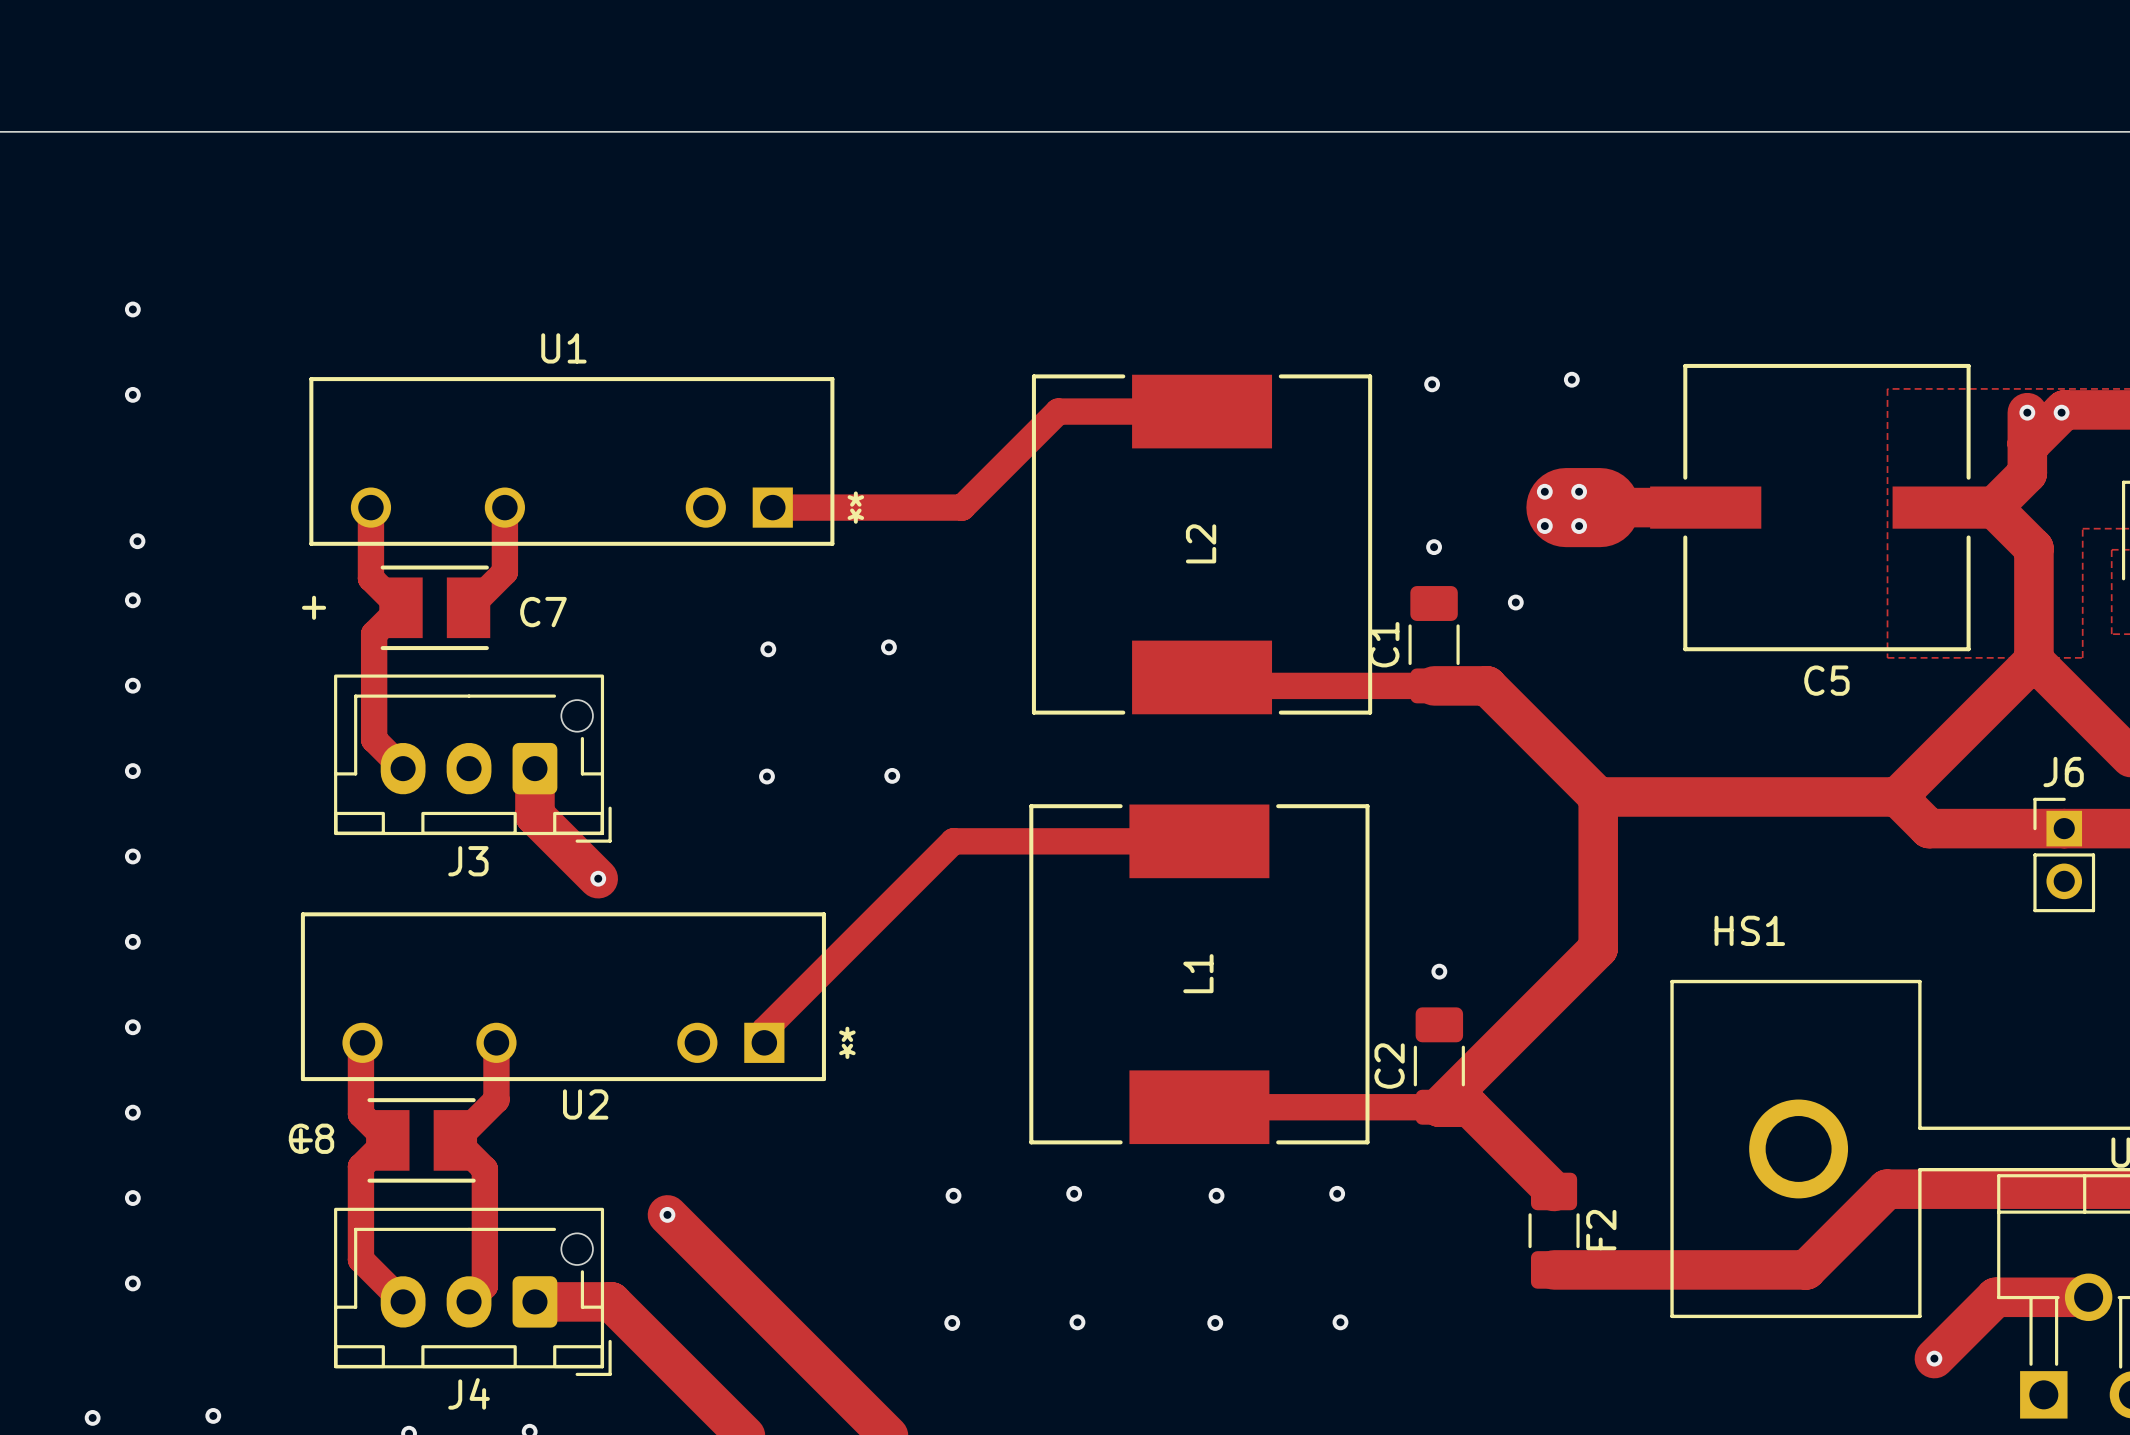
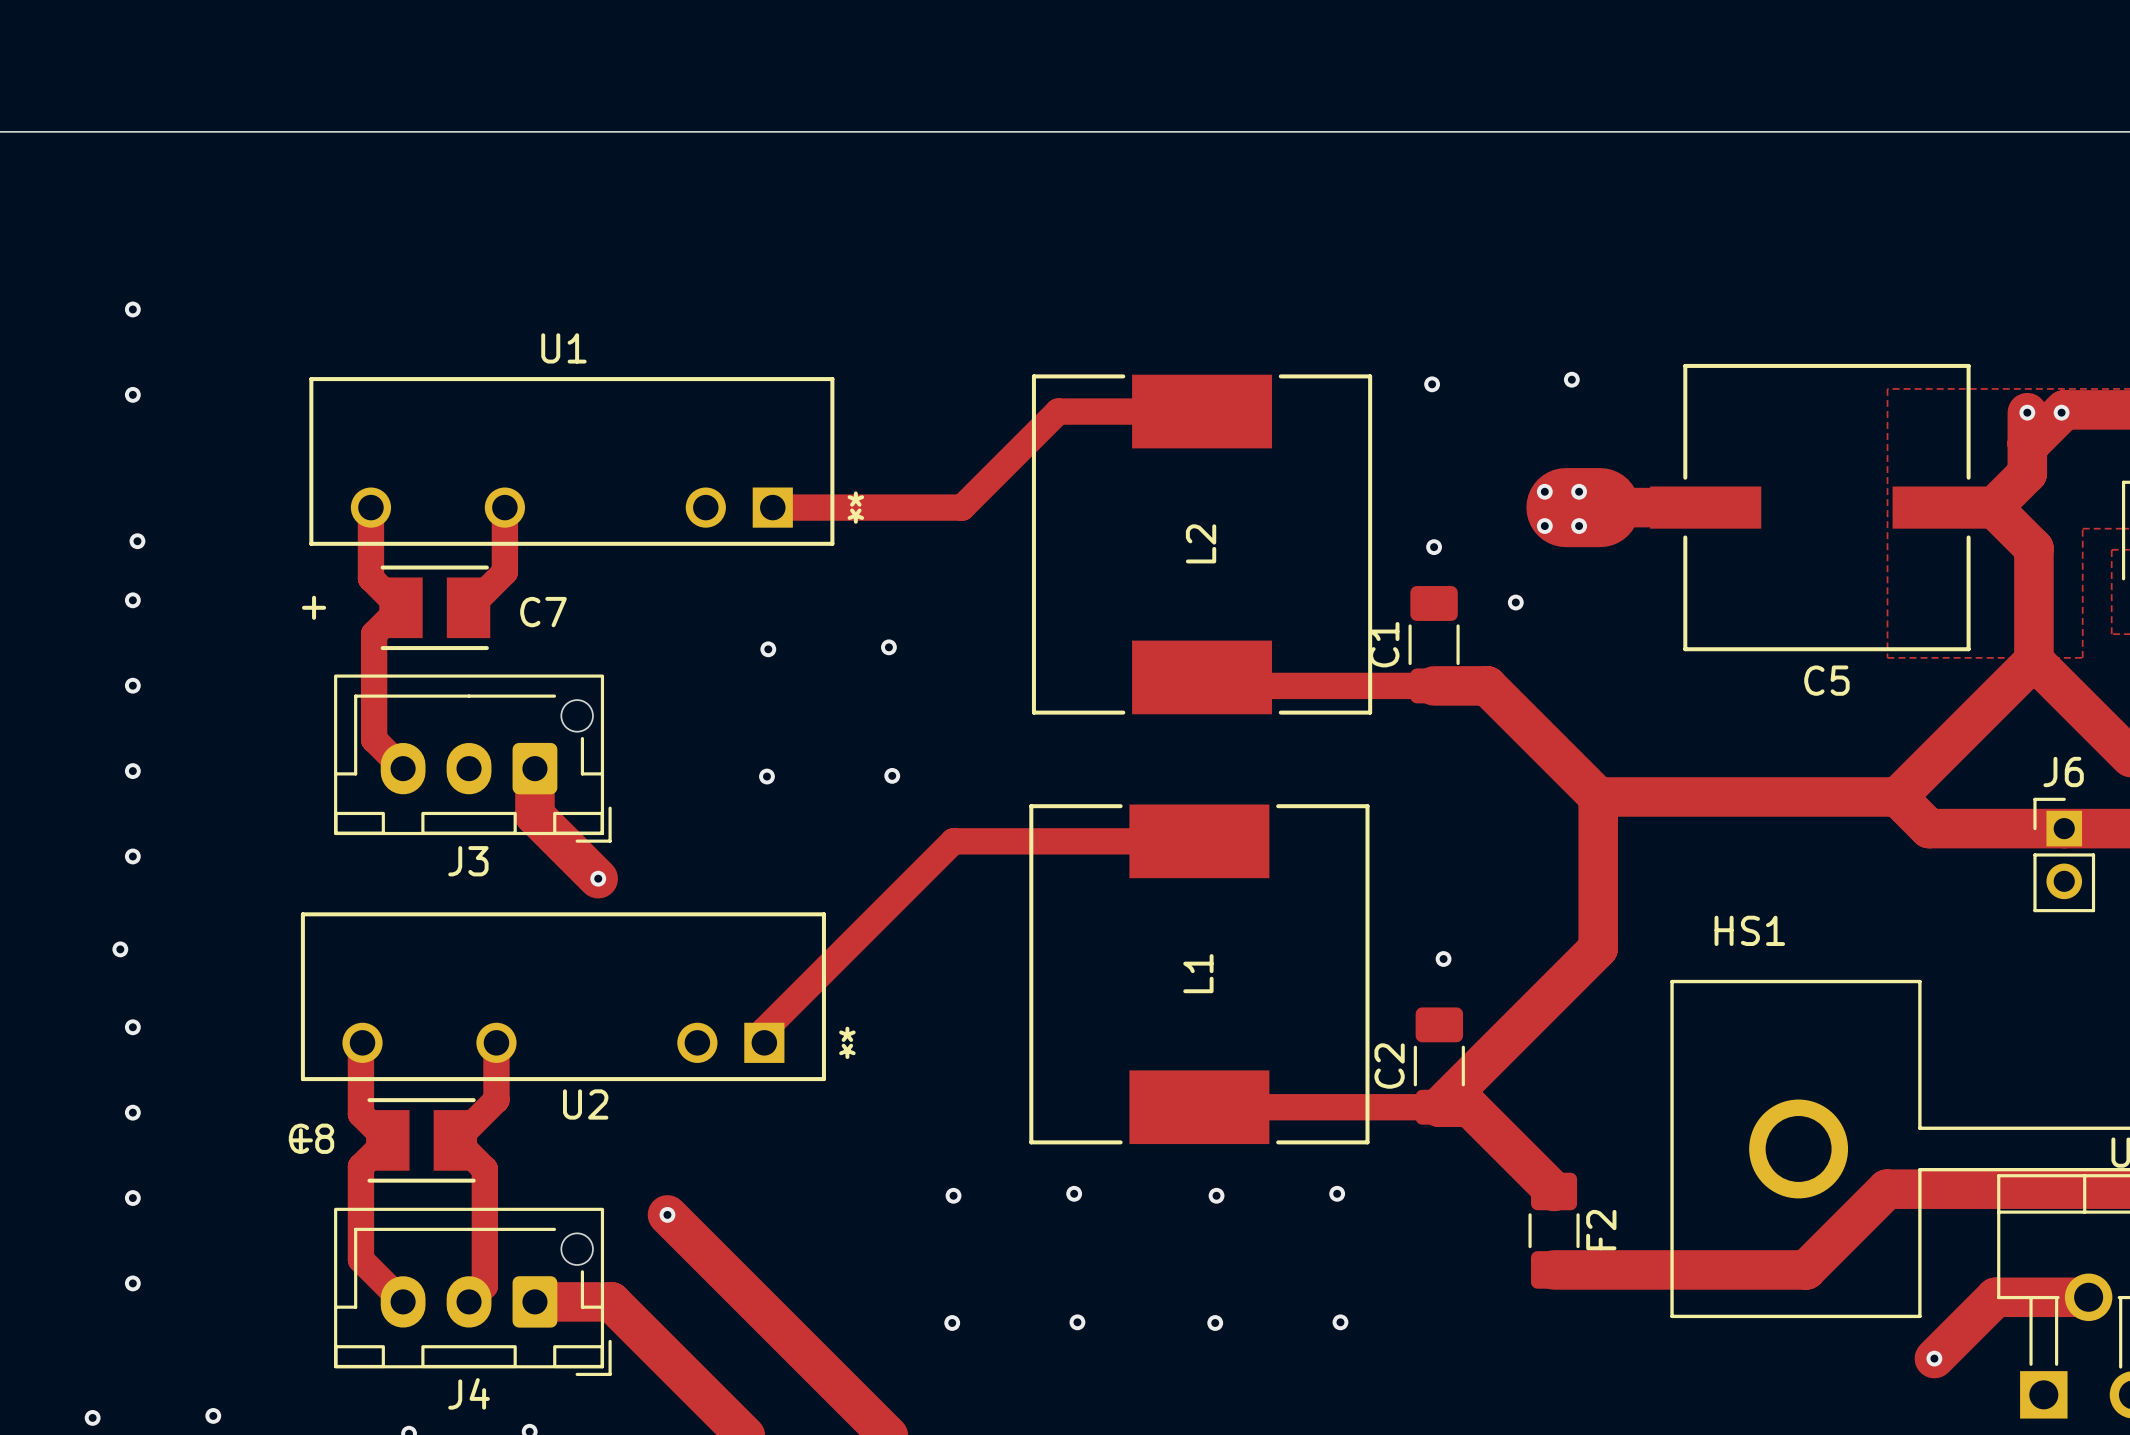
via position: (132, 941) -> (120, 949)
via position: (1439, 971) -> (1443, 958)

